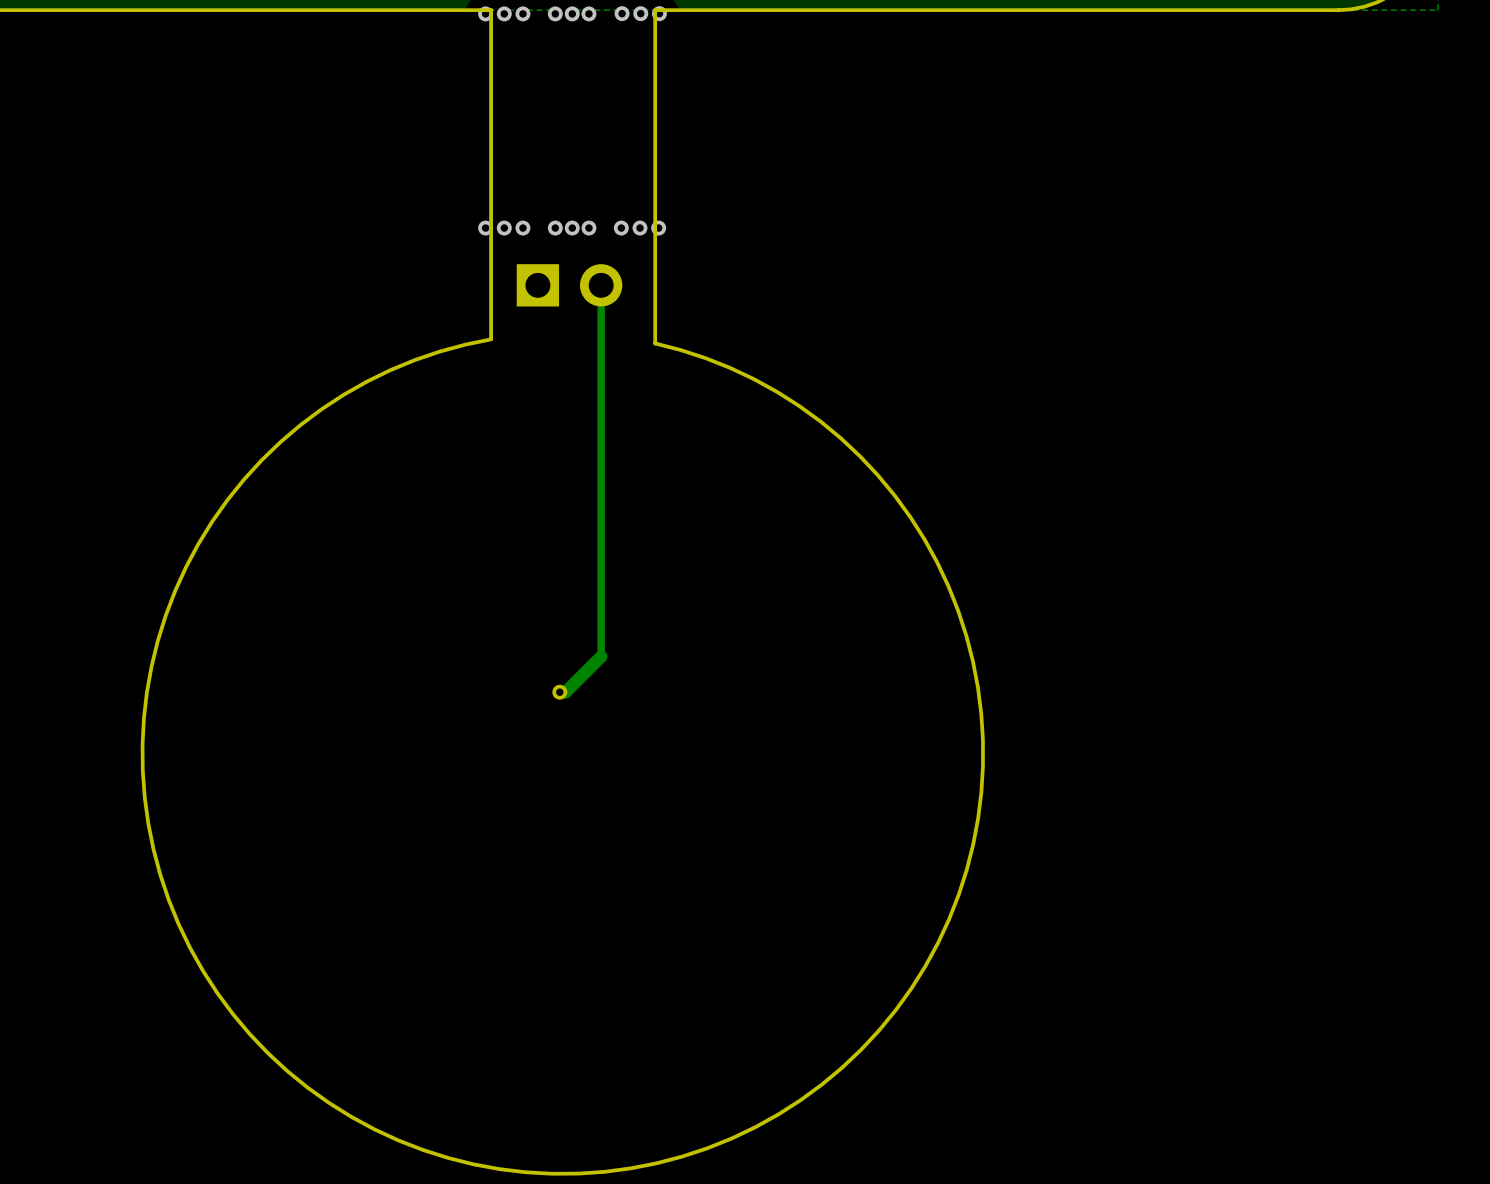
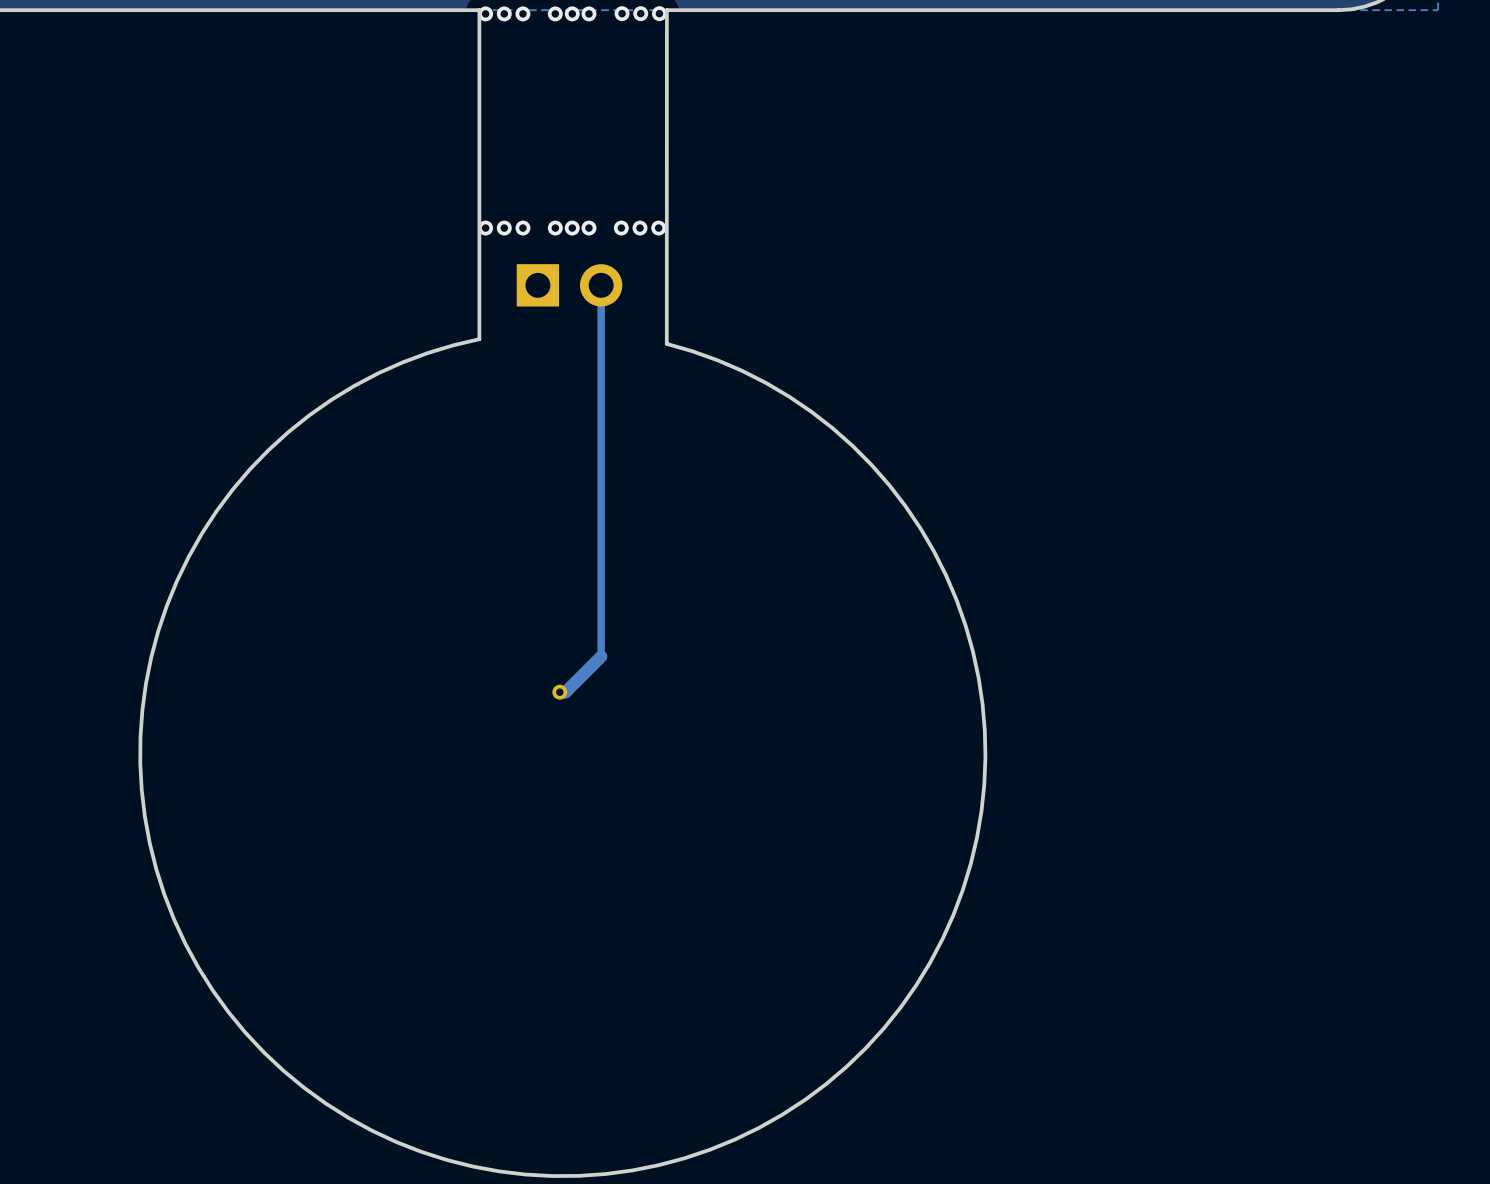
board edge: (479, 10) (491, 10) (491, 339) -> none
board edge: (666, 10) (655, 10) (655, 343) (705, 358) (730, 367) (777, 391) (820, 421) (840, 438) (860, 456) (894, 495) (924, 539) (937, 562) (958, 610) (972, 661) (977, 687) (982, 739) (982, 765) (978, 818) (973, 844) (966, 869) (949, 919) (925, 966) (895, 1009) (879, 1030) (861, 1049) (821, 1084) (778, 1114) (755, 1127) (707, 1148) (656, 1163) (630, 1168) (578, 1173) (552, 1173) (499, 1169) (473, 1164) (423, 1150) (398, 1140) (351, 1117) (307, 1087) (287, 1071) (249, 1034) (232, 1014) (202, 970) (190, 947) (168, 899) (153, 849) (148, 823) (142, 771) (142, 744) (143, 718) (151, 666) (165, 615) (186, 567) (212, 521) (227, 499) (261, 460) (280, 441) (321, 409) (344, 394) (390, 370) (414, 360) (465, 344) (491, 339) -> (666, 10) (666, 343) (717, 360) (766, 383) (789, 396) (832, 428) (852, 446) (889, 485) (905, 506) (934, 551) (946, 575) (956, 600) (972, 651) (982, 704) (985, 757) (984, 784) (977, 837) (970, 863) (963, 889) (942, 938) (916, 985) (900, 1007) (865, 1048) (846, 1066) (804, 1100) (782, 1114) (734, 1139) (709, 1149) (684, 1158) (632, 1170) (579, 1175) (552, 1176) (498, 1171) (446, 1159) (421, 1151) (396, 1141) (348, 1117) (325, 1103) (283, 1070) (245, 1032) (228, 1011) (212, 990) (185, 944) (174, 919) (156, 869) (144, 816) (141, 790) (140, 736) (142, 709) (146, 683) (158, 631) (176, 580) (188, 556) (201, 533) (232, 489) (268, 450) (288, 431) (309, 415) (354, 385) (402, 362) (453, 345) (479, 339) (479, 10)

